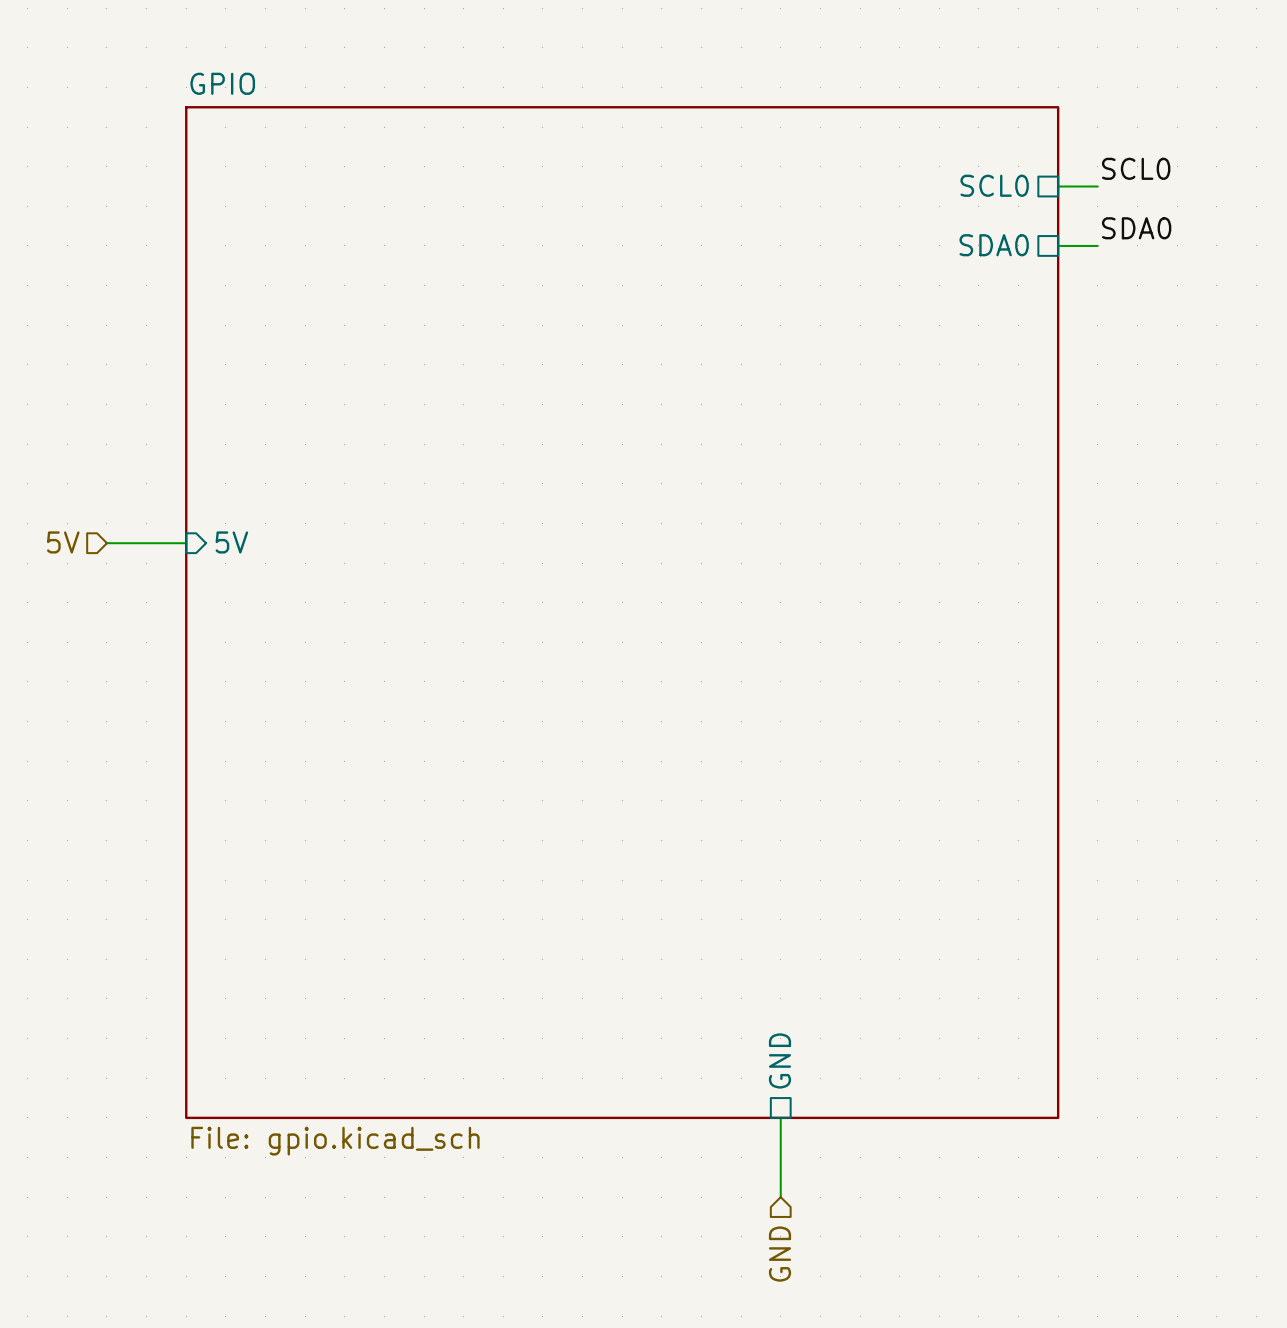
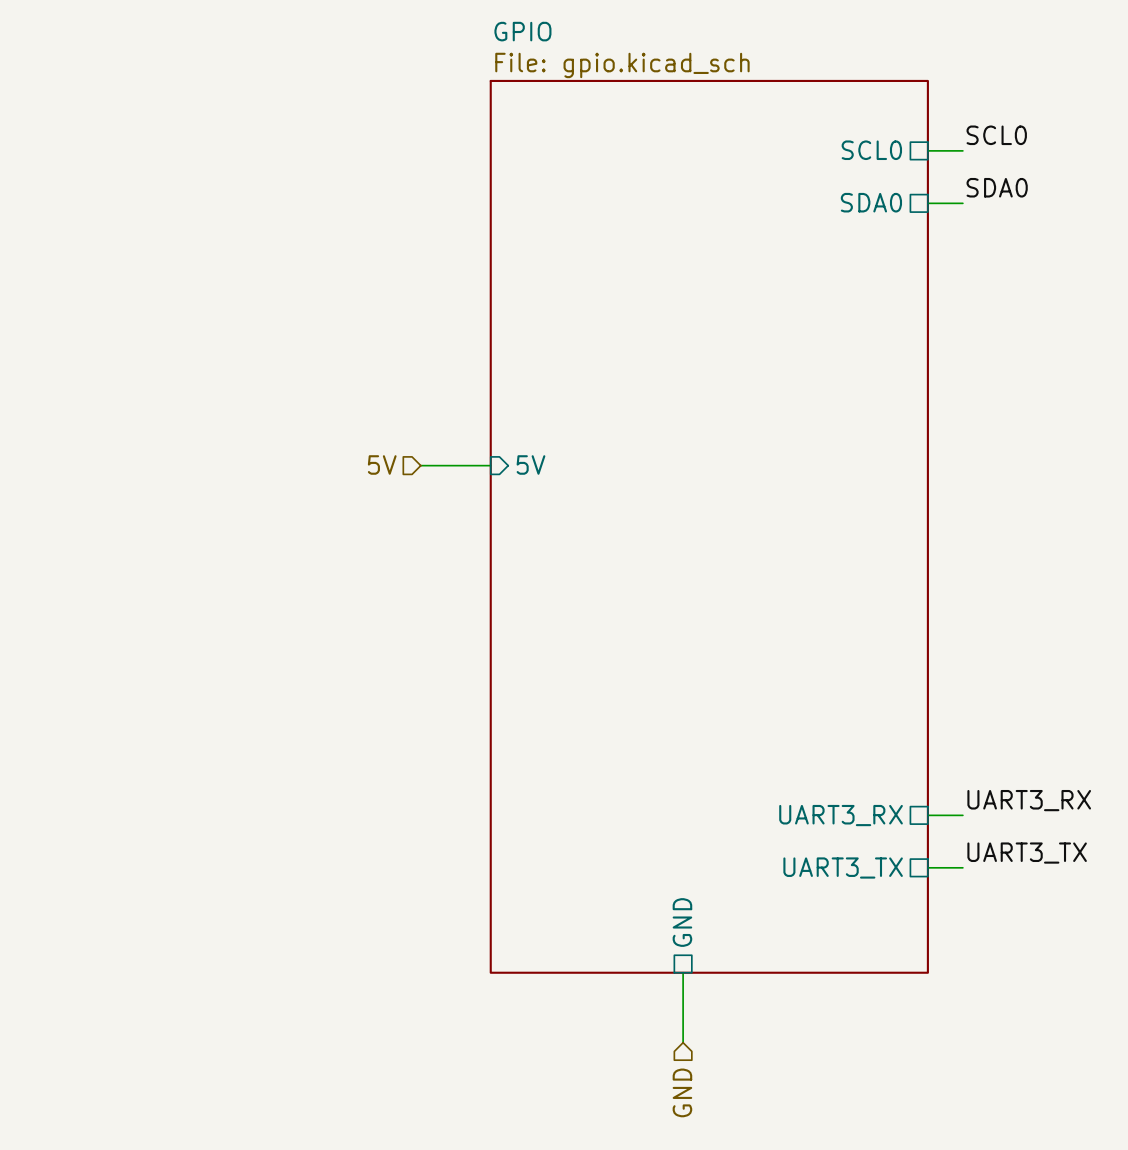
hierarchical label position: 5V (63, 542) -> 5V (382, 464)
sheet pin position: 5V (231, 542) -> 5V (530, 464)
wire: (106, 543) (186, 543) -> (420, 465) (490, 465)
sheet GPIO: File: gpio.kicad_sch (622, 612) -> none
sheet GPIO: none -> File: gpio.kicad_sch (709, 526)
label: none -> UART3_RX (1029, 800)
sheet pin: none -> UART3_RX (841, 815)
wire: none -> (927, 815) (962, 815)
label: none -> UART3_TX (1027, 853)
wire: none -> (927, 867) (962, 867)
sheet pin: none -> UART3_TX (843, 868)

